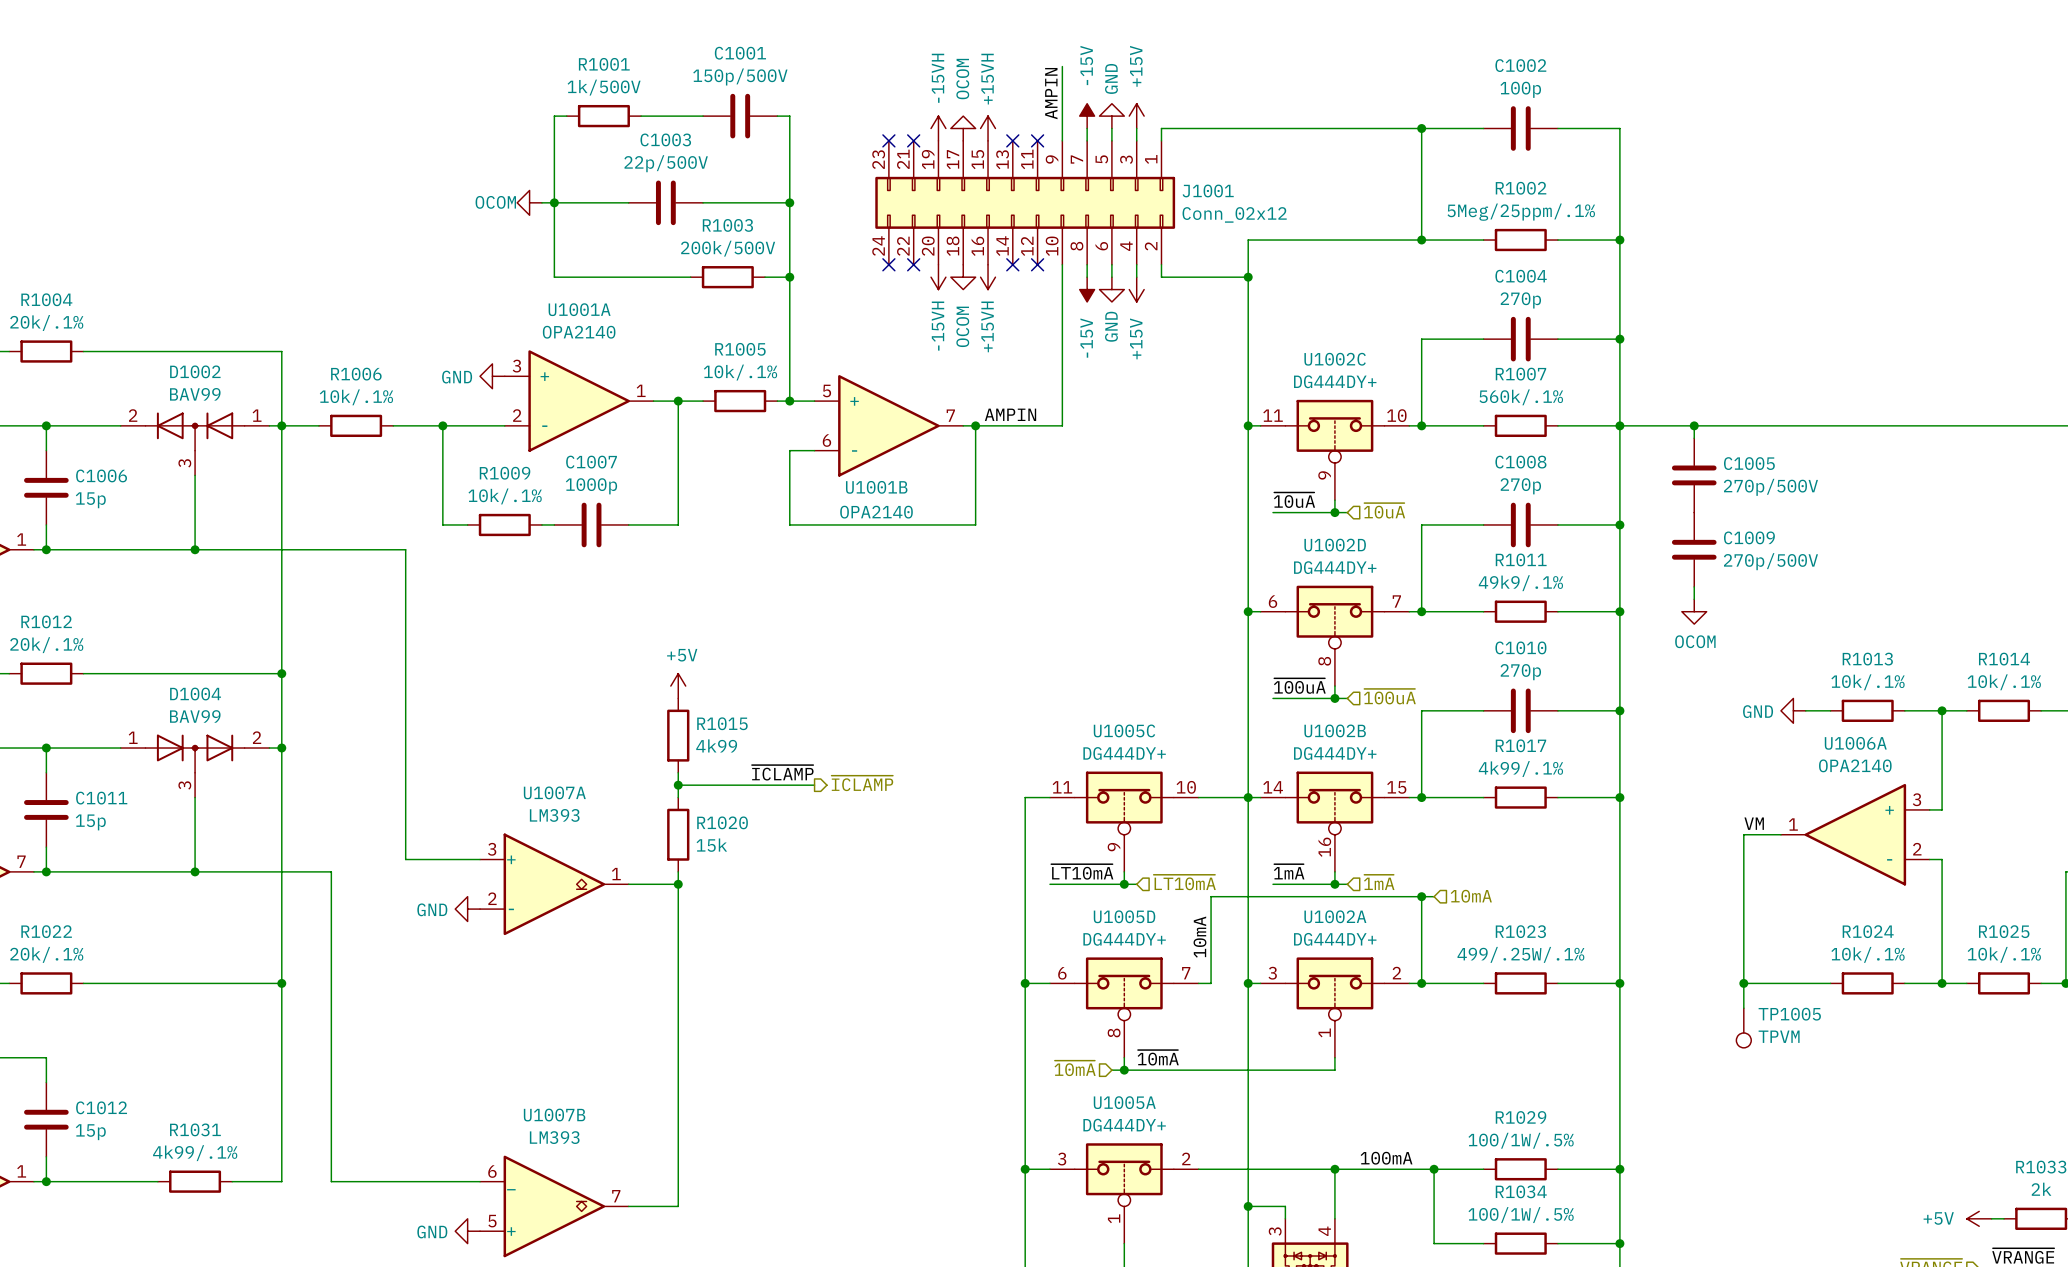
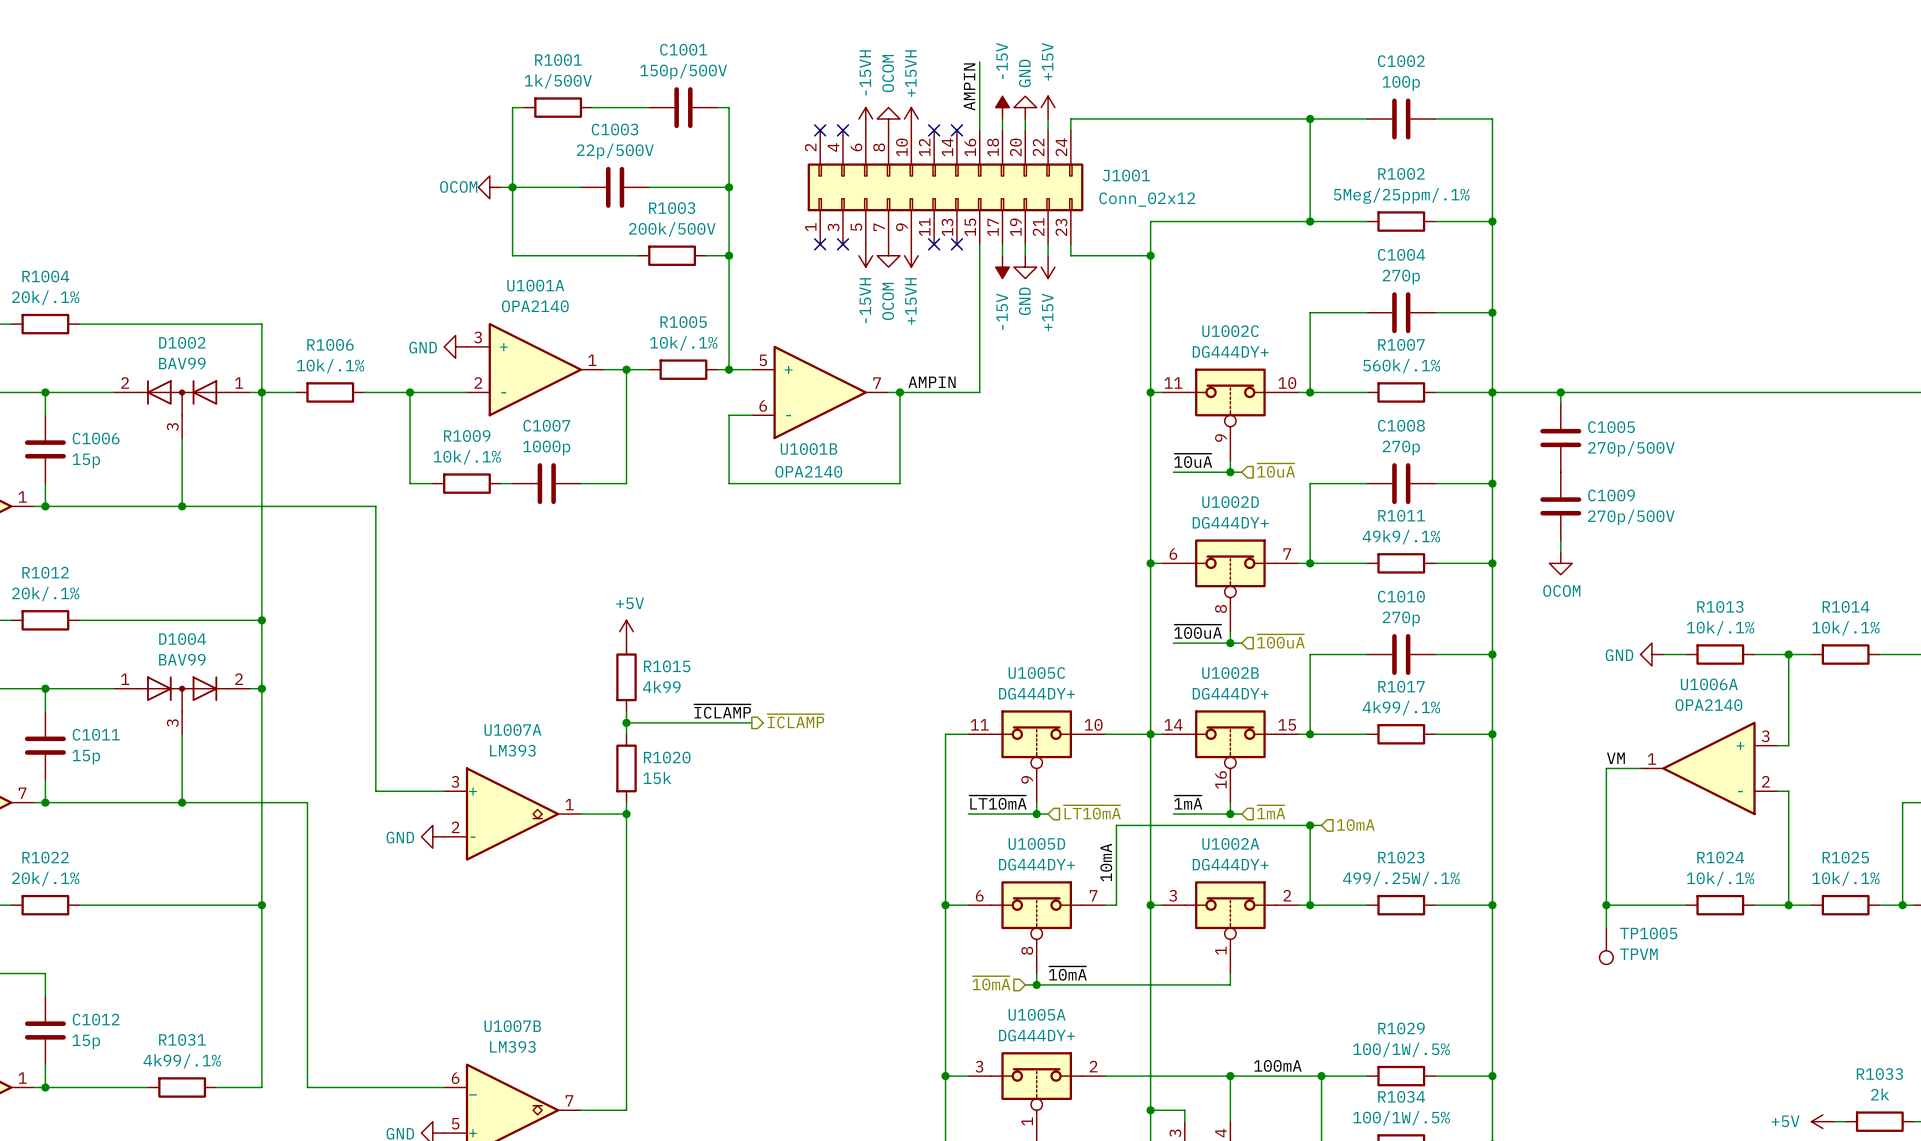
J1001 rotation: 0° (1025, 202) -> 180° (945, 187)

